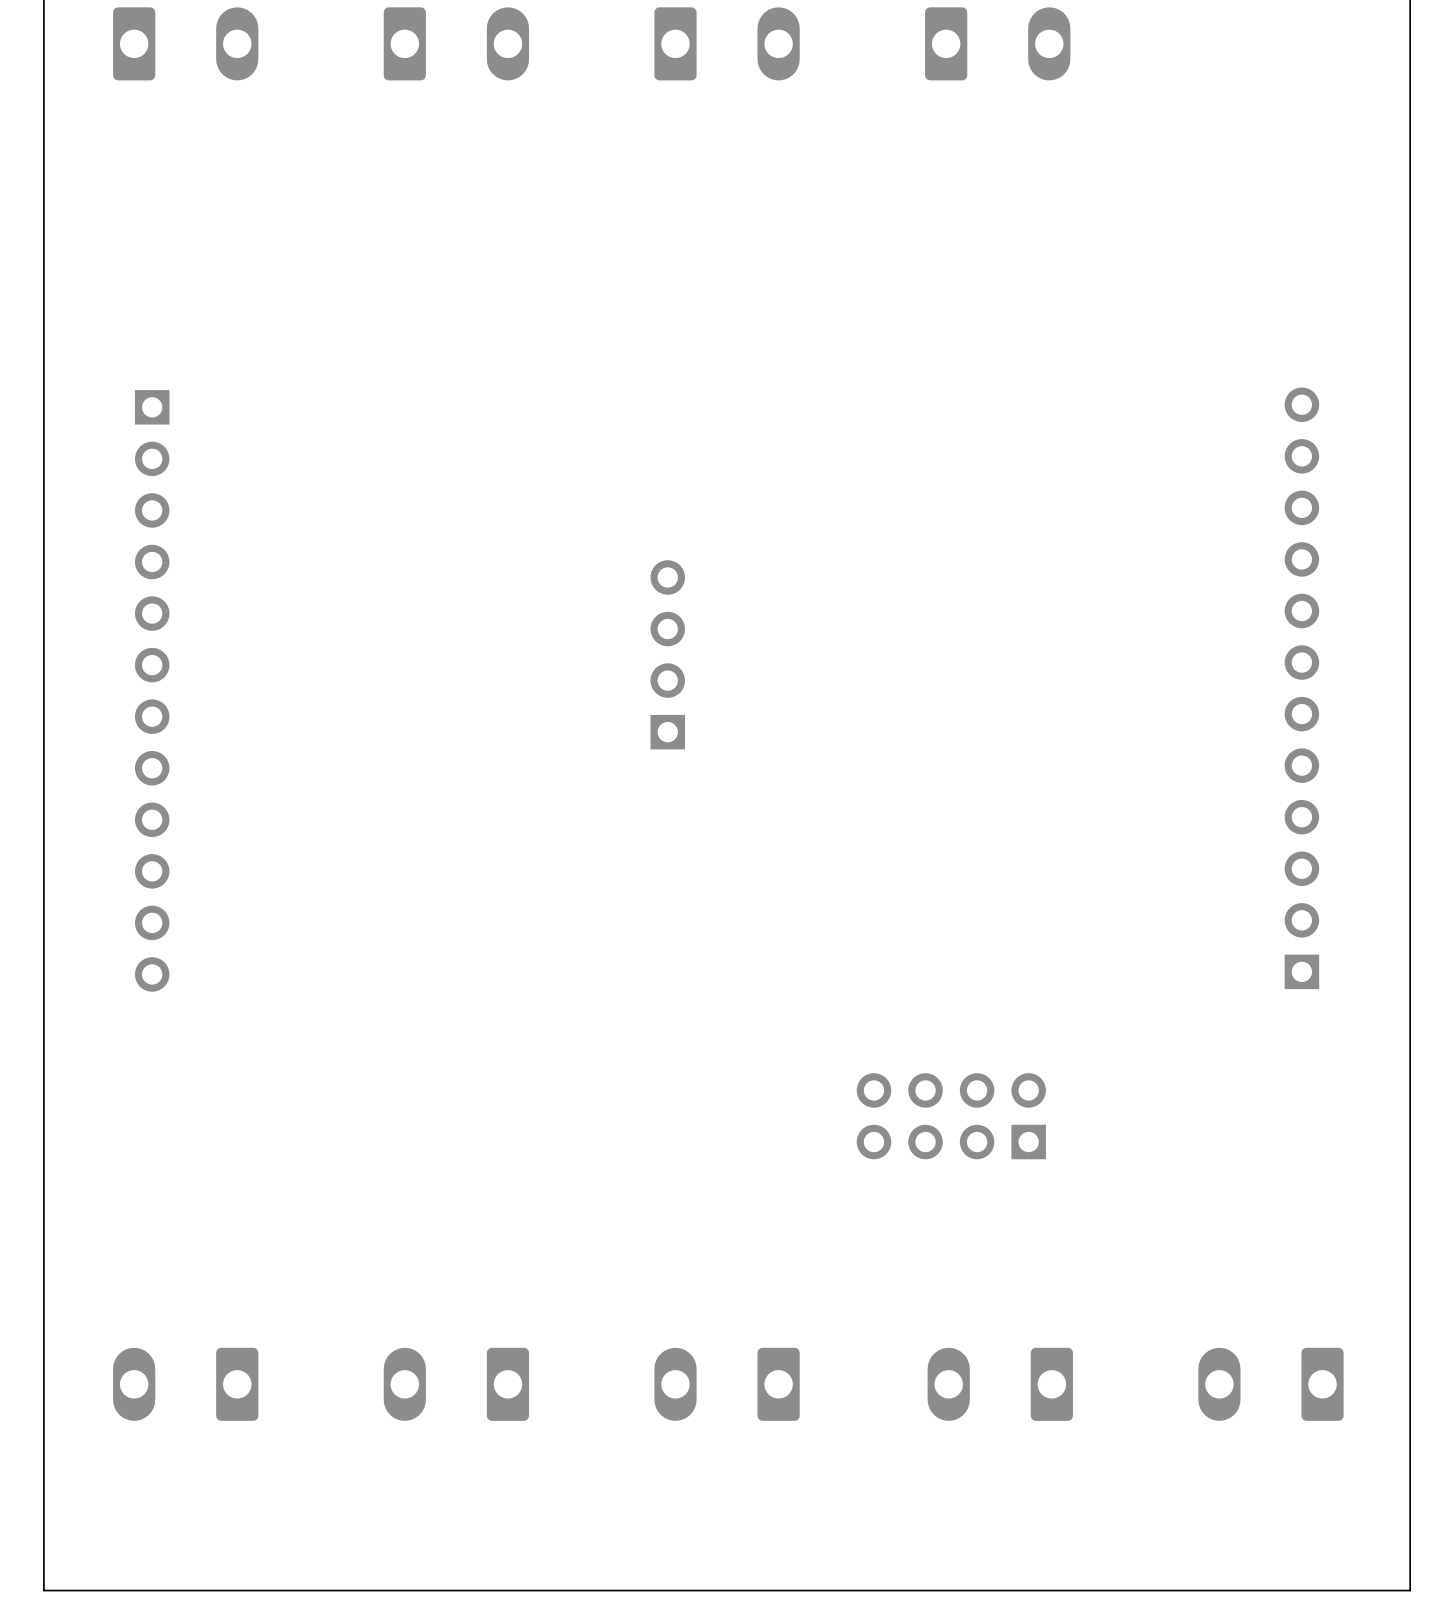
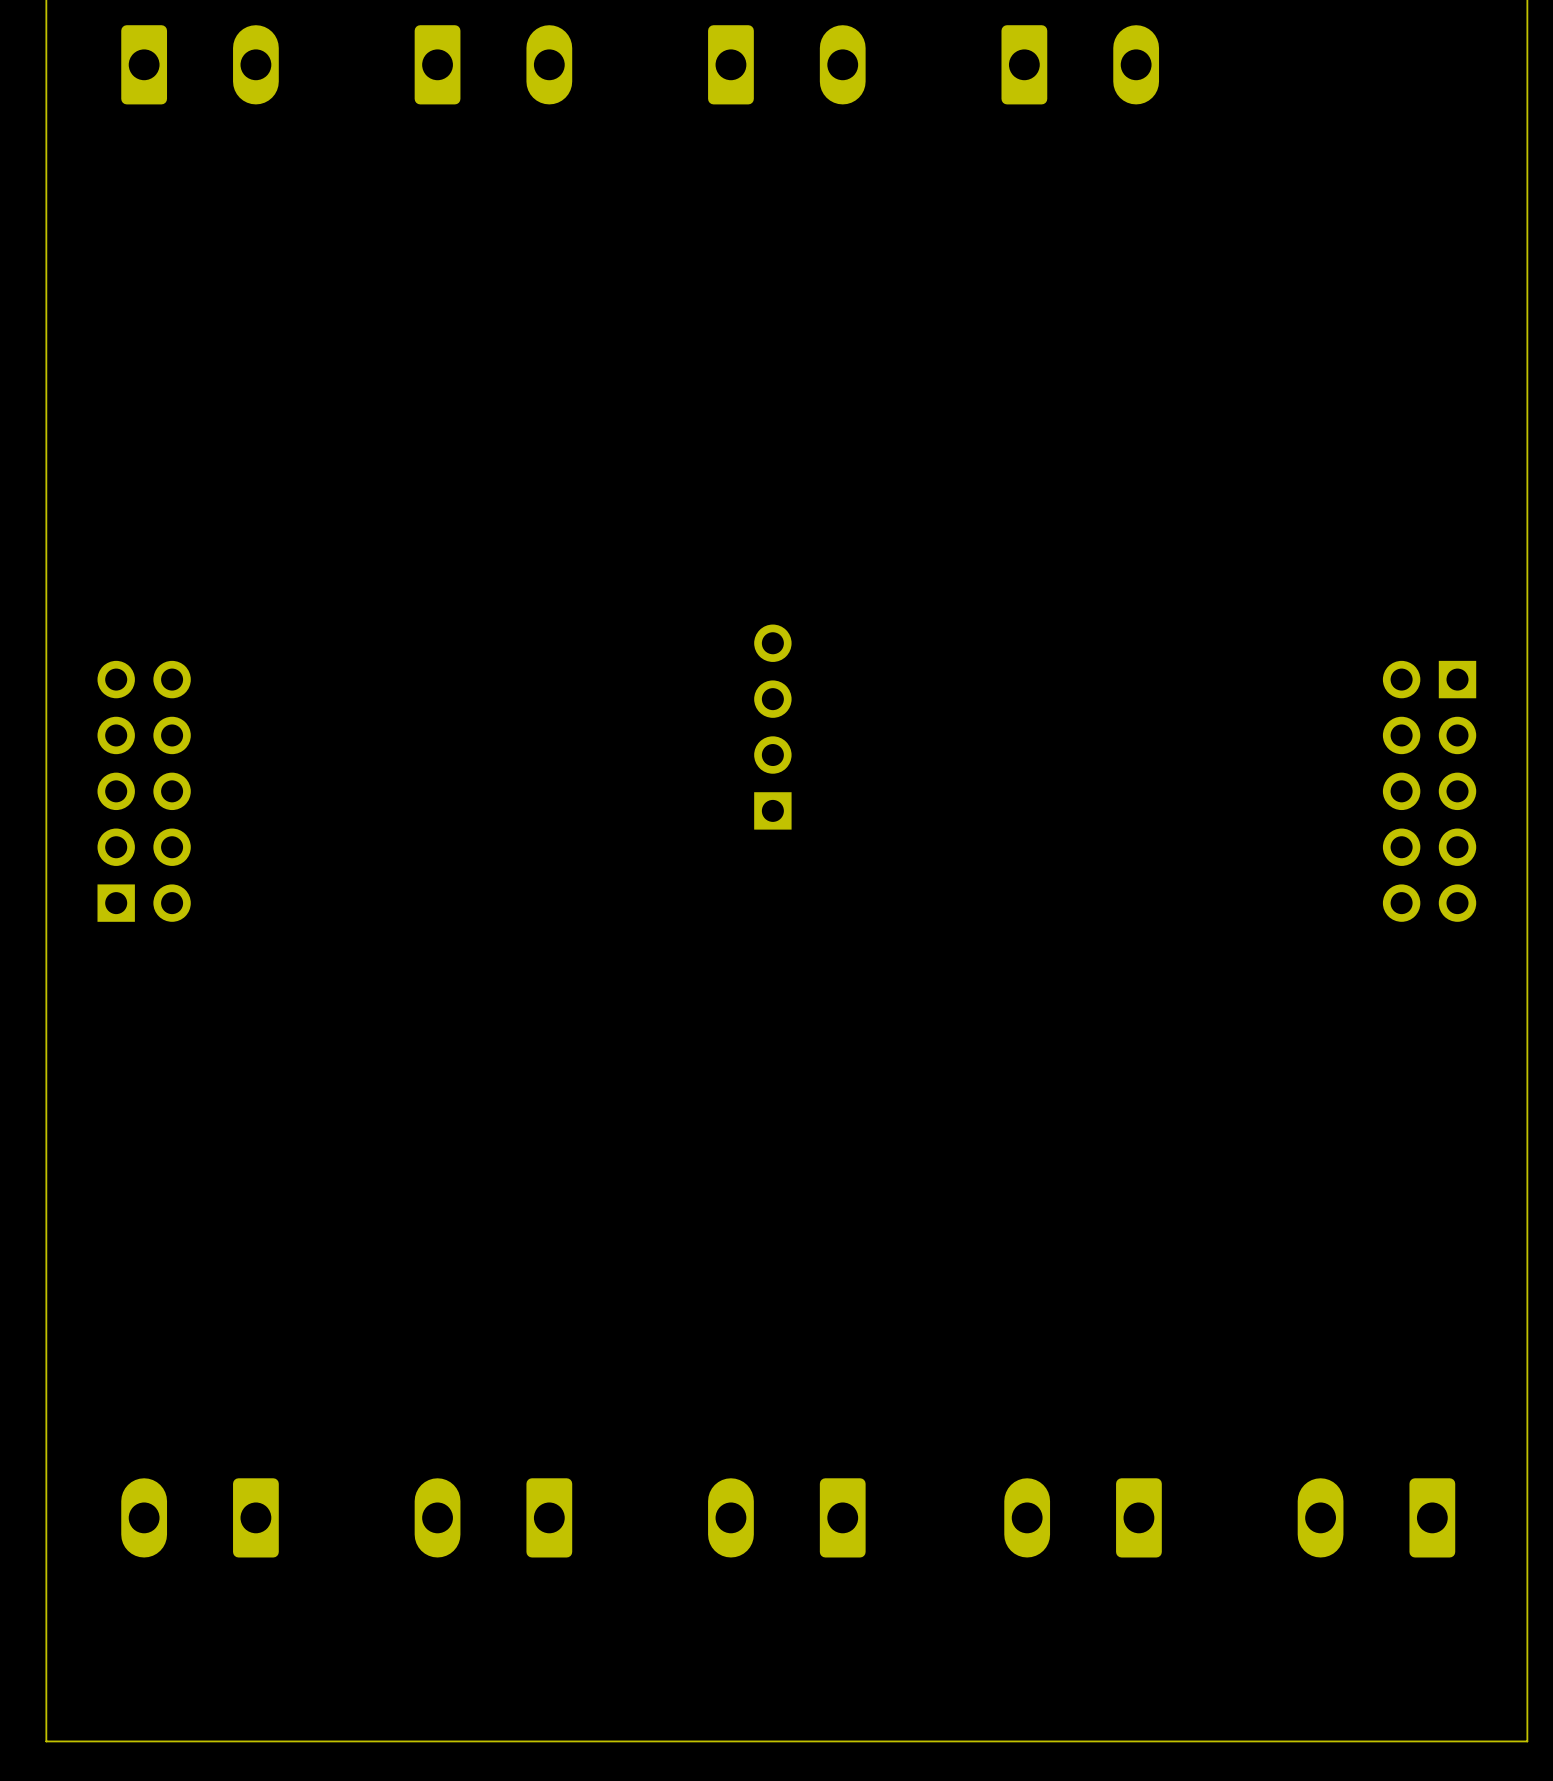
part position: (667, 654) -> (772, 727)
part: (1301, 688) -> none
part: (152, 690) -> none
part: none -> (144, 791)
part: none -> (1429, 791)
part: (951, 1116) -> none

